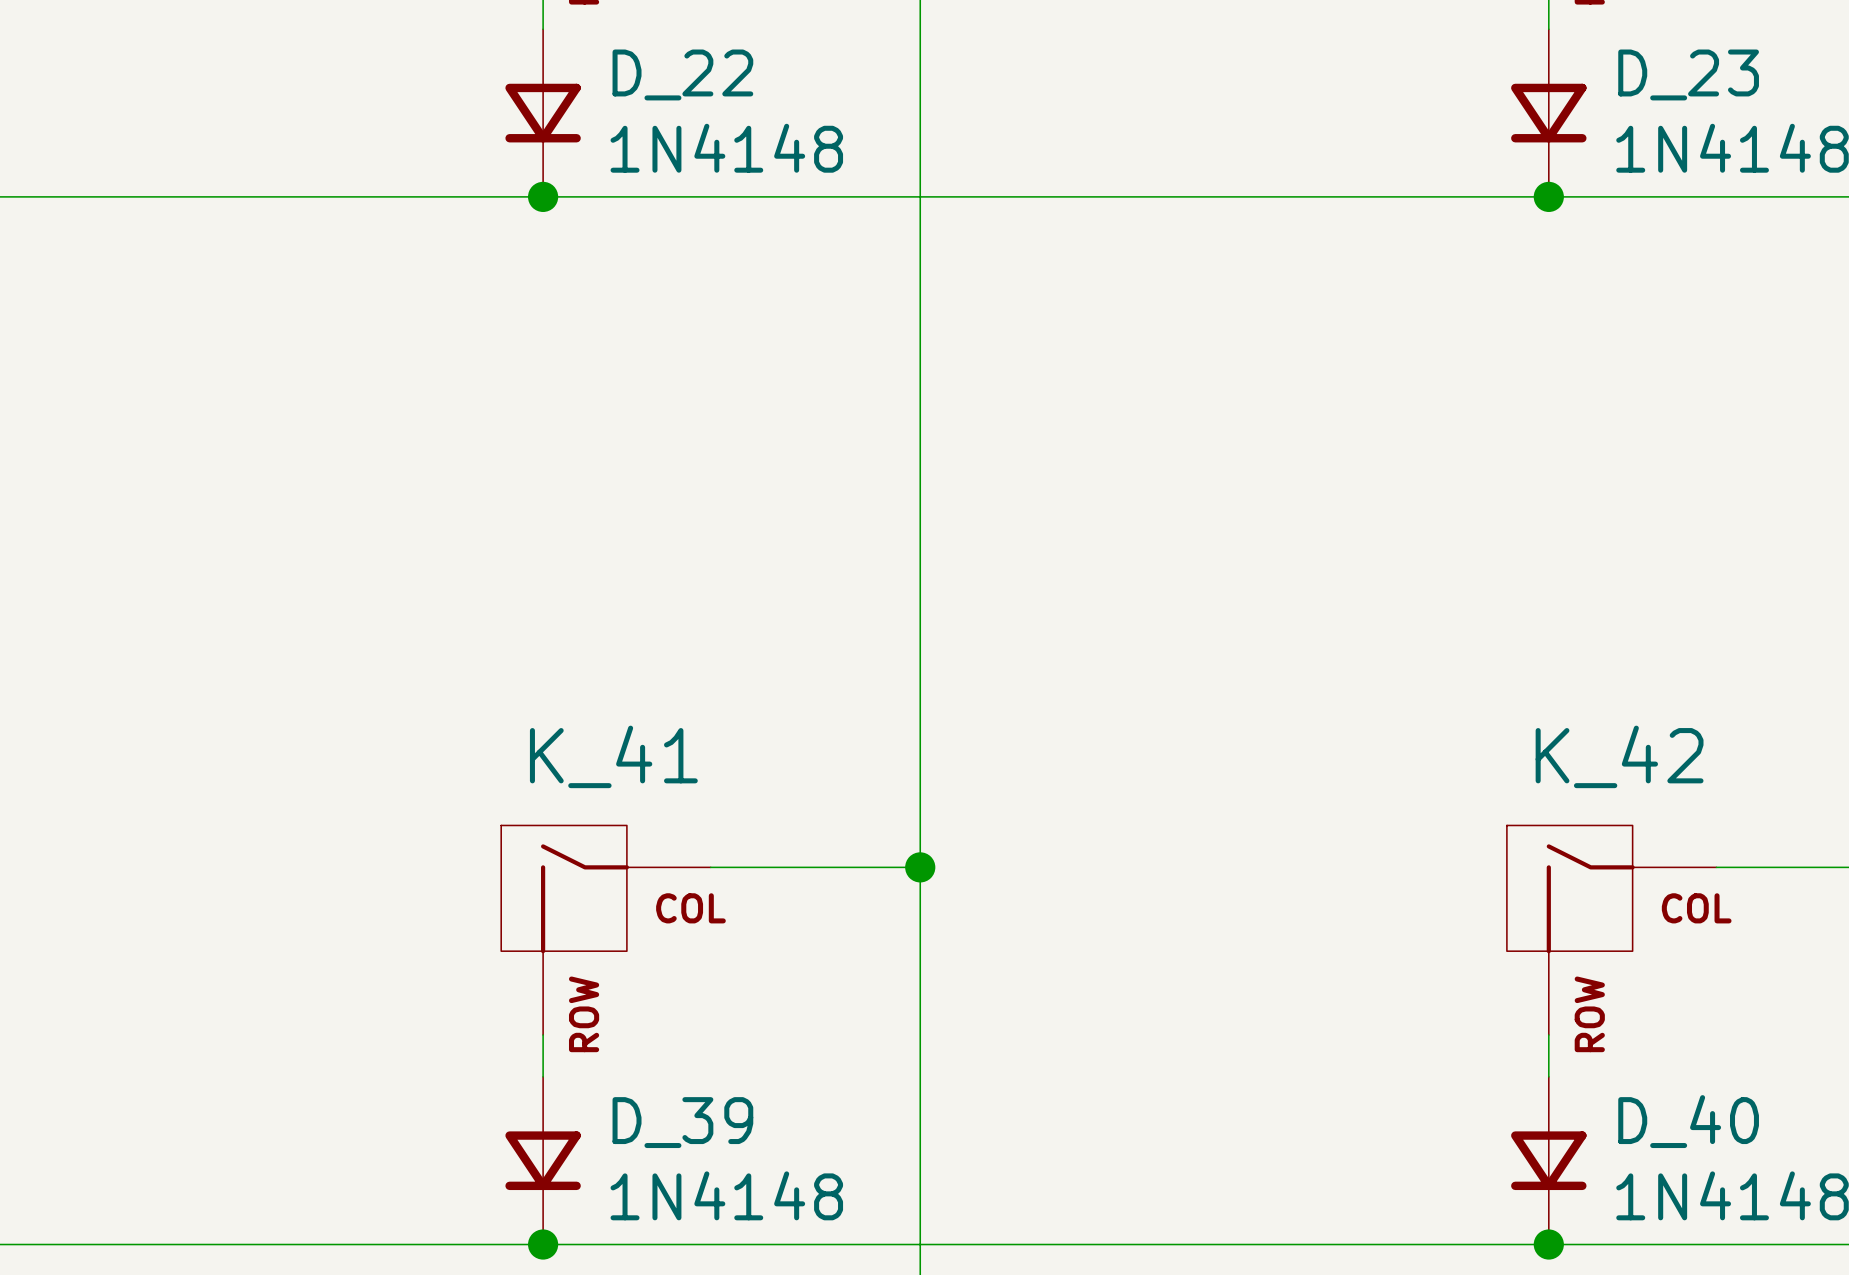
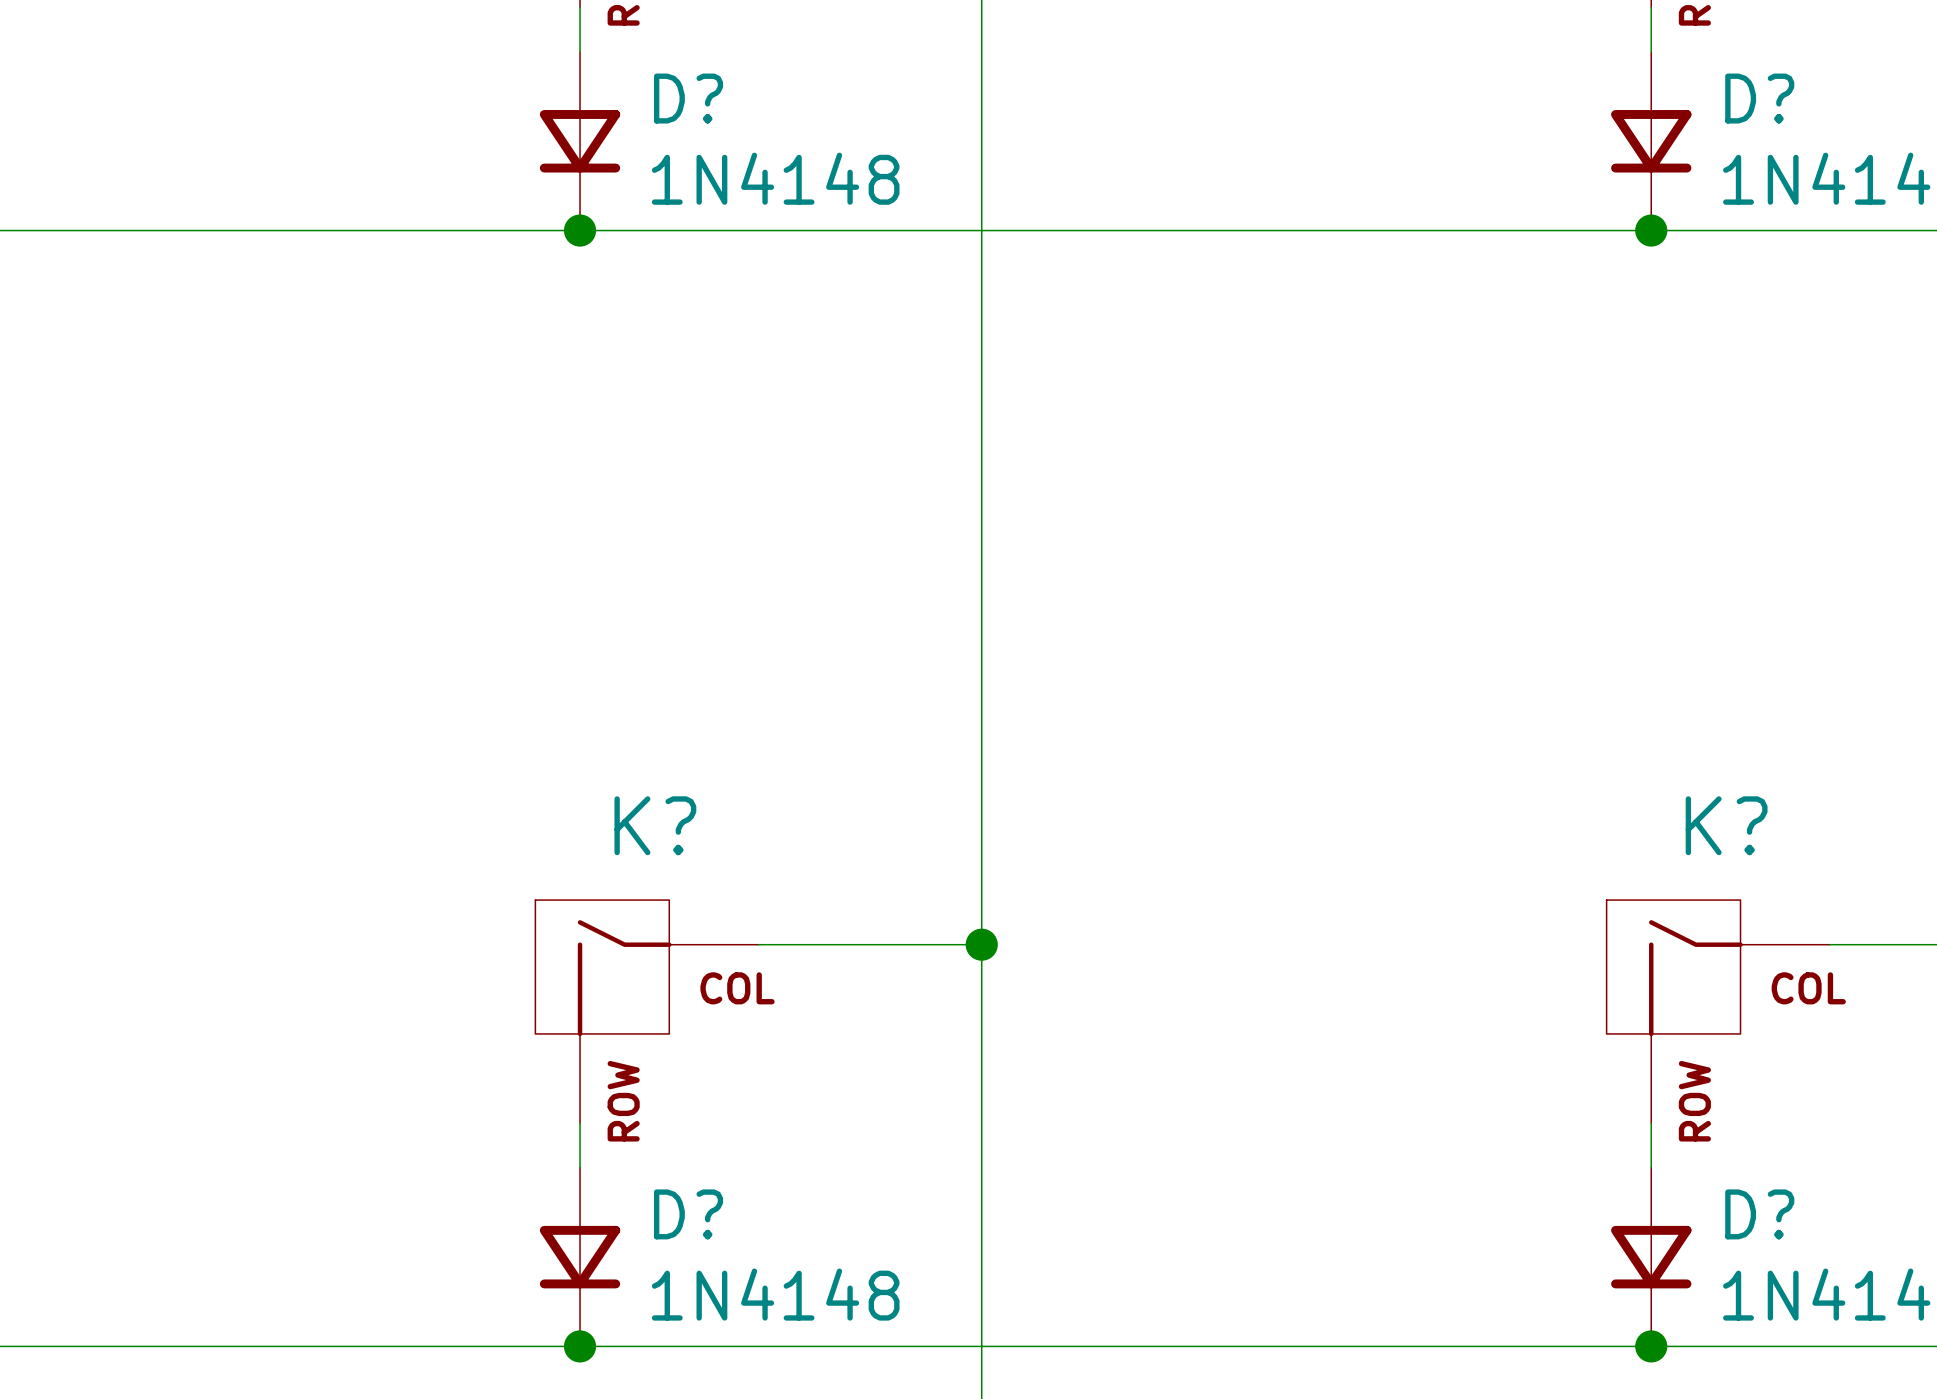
D_22 name: D_22 (682, 74) -> D? (688, 98)
D_23 name: D_23 (1688, 74) -> D? (1759, 98)
K_41 name: K_41 (613, 756) -> K? (655, 825)
K_42 name: K_42 (1619, 756) -> K? (1726, 825)
D_40 name: D_40 (1688, 1121) -> D? (1759, 1214)
D_39 name: D_39 (682, 1122) -> D? (688, 1214)

